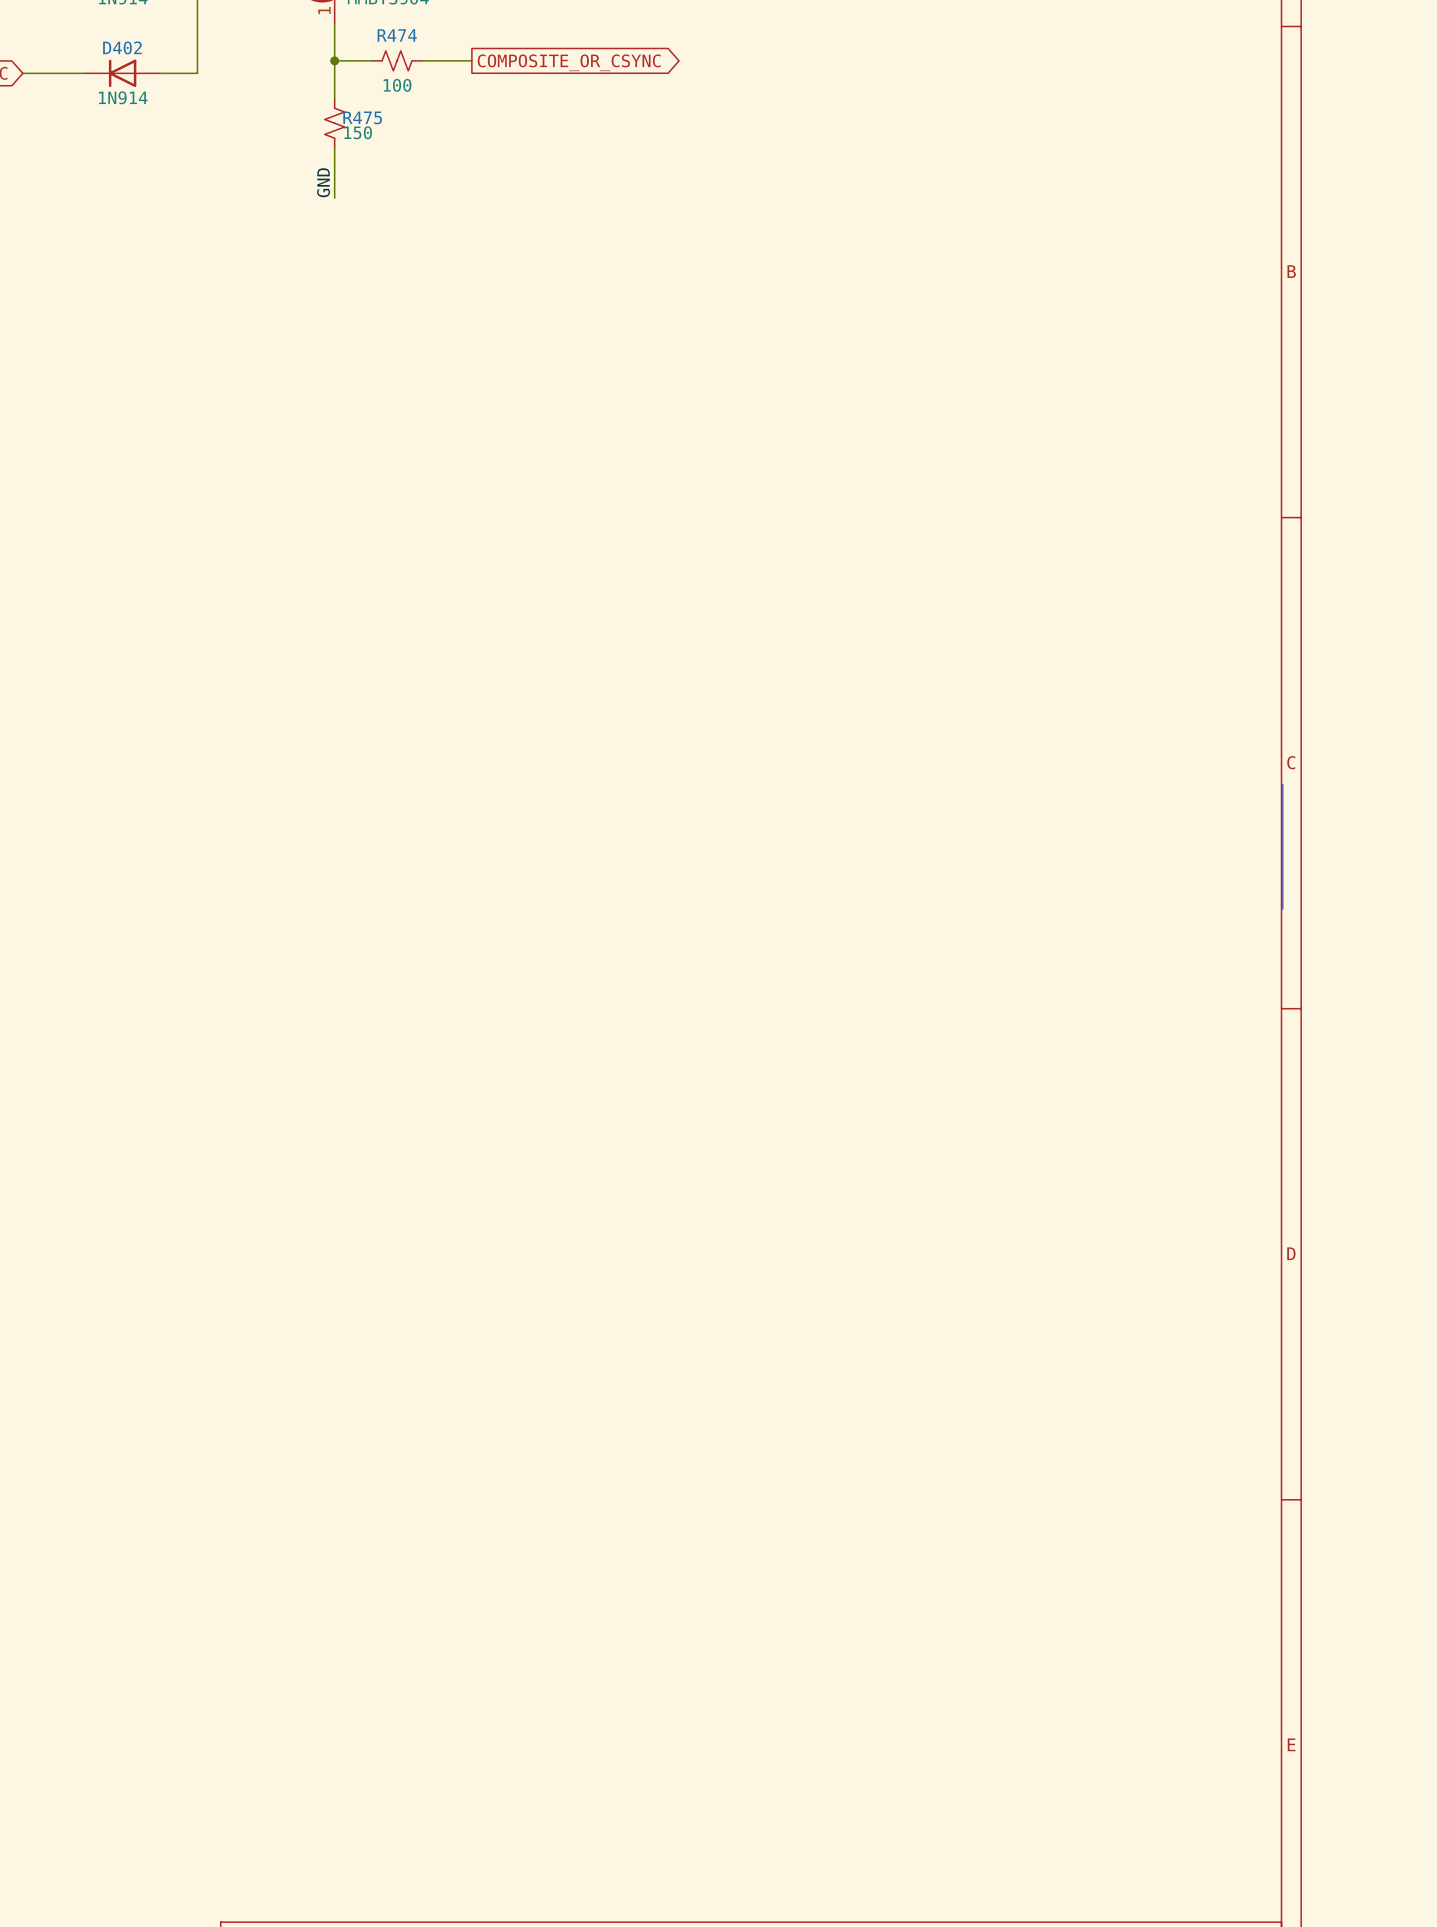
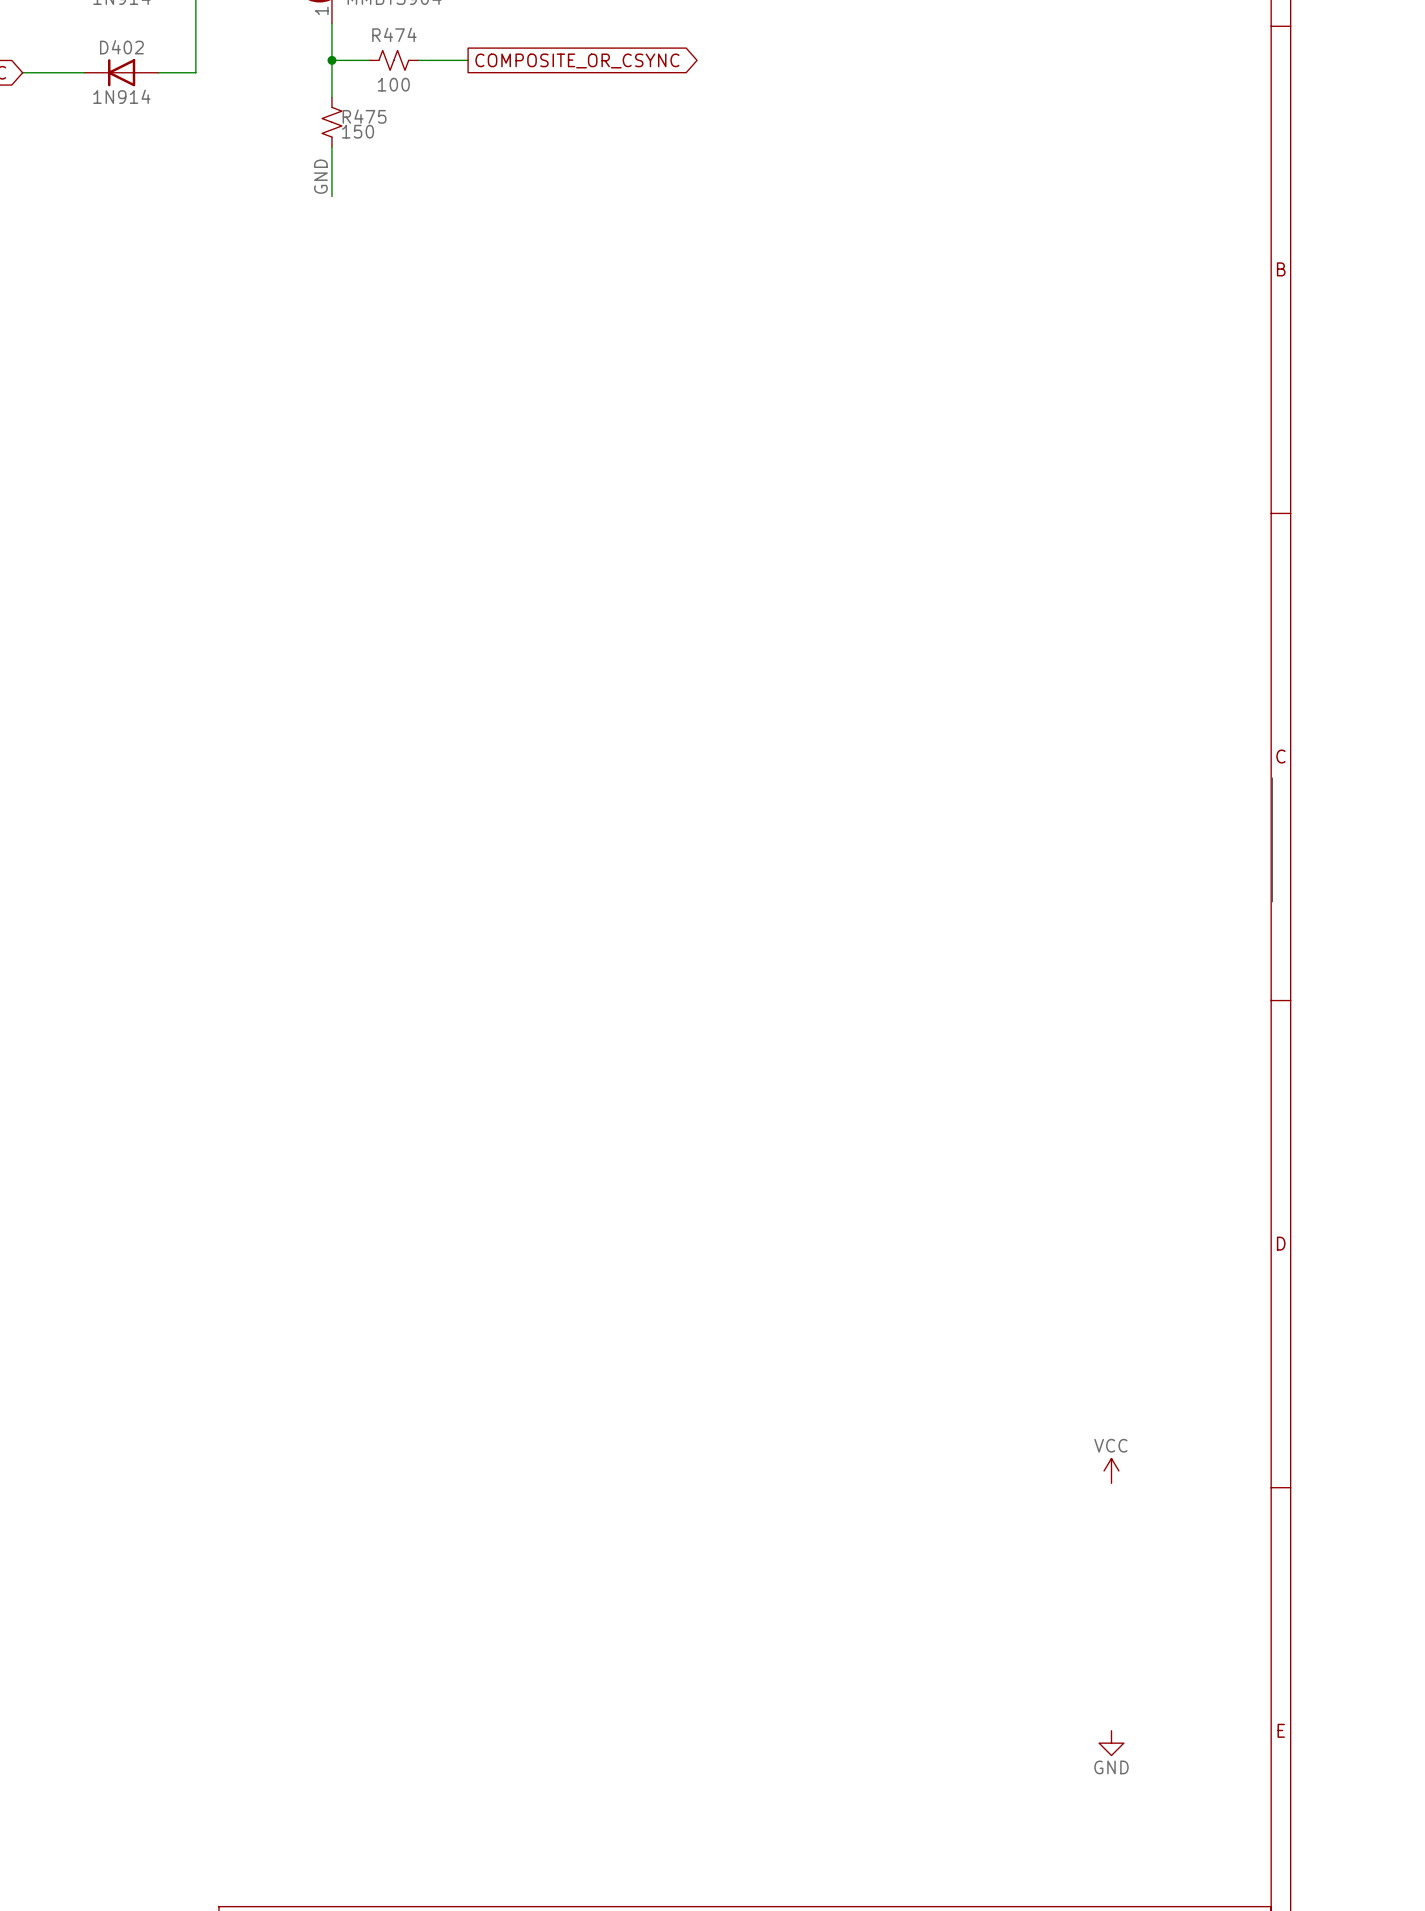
power symbol: none -> VCC (1111, 1470)
power symbol: none -> GND (1111, 1743)

